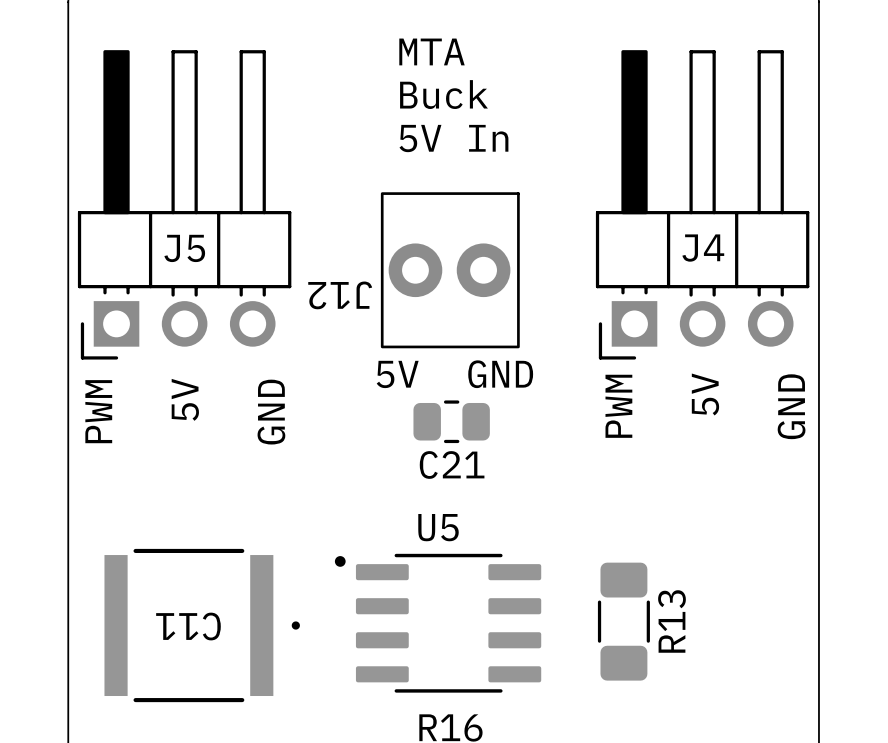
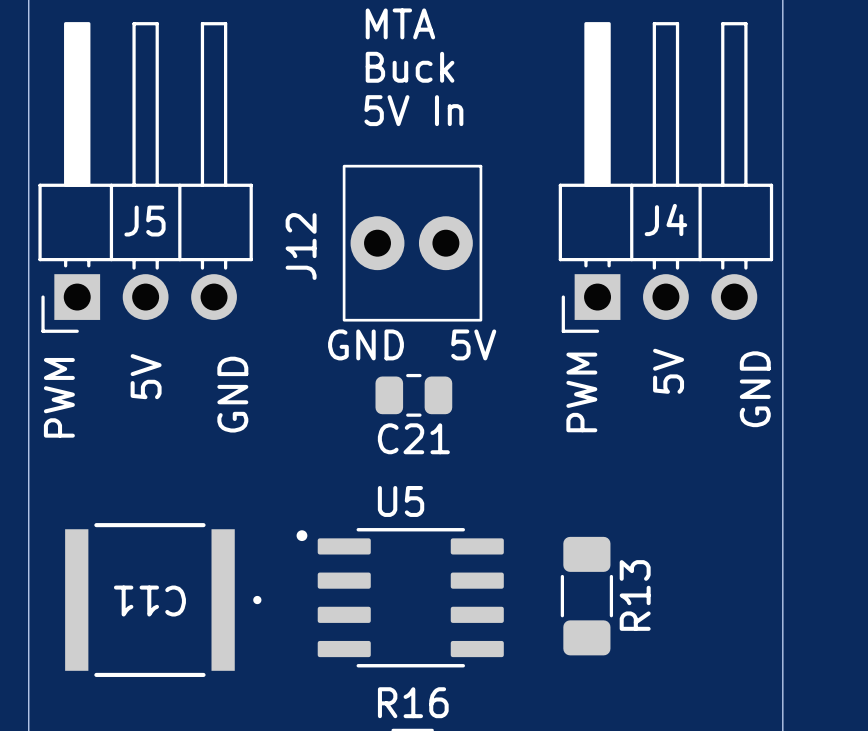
J12 name rotation: 0° (340, 295) -> 90° clockwise (301, 246)
text: 5V GND (454, 374) -> GND 5V (412, 344)

